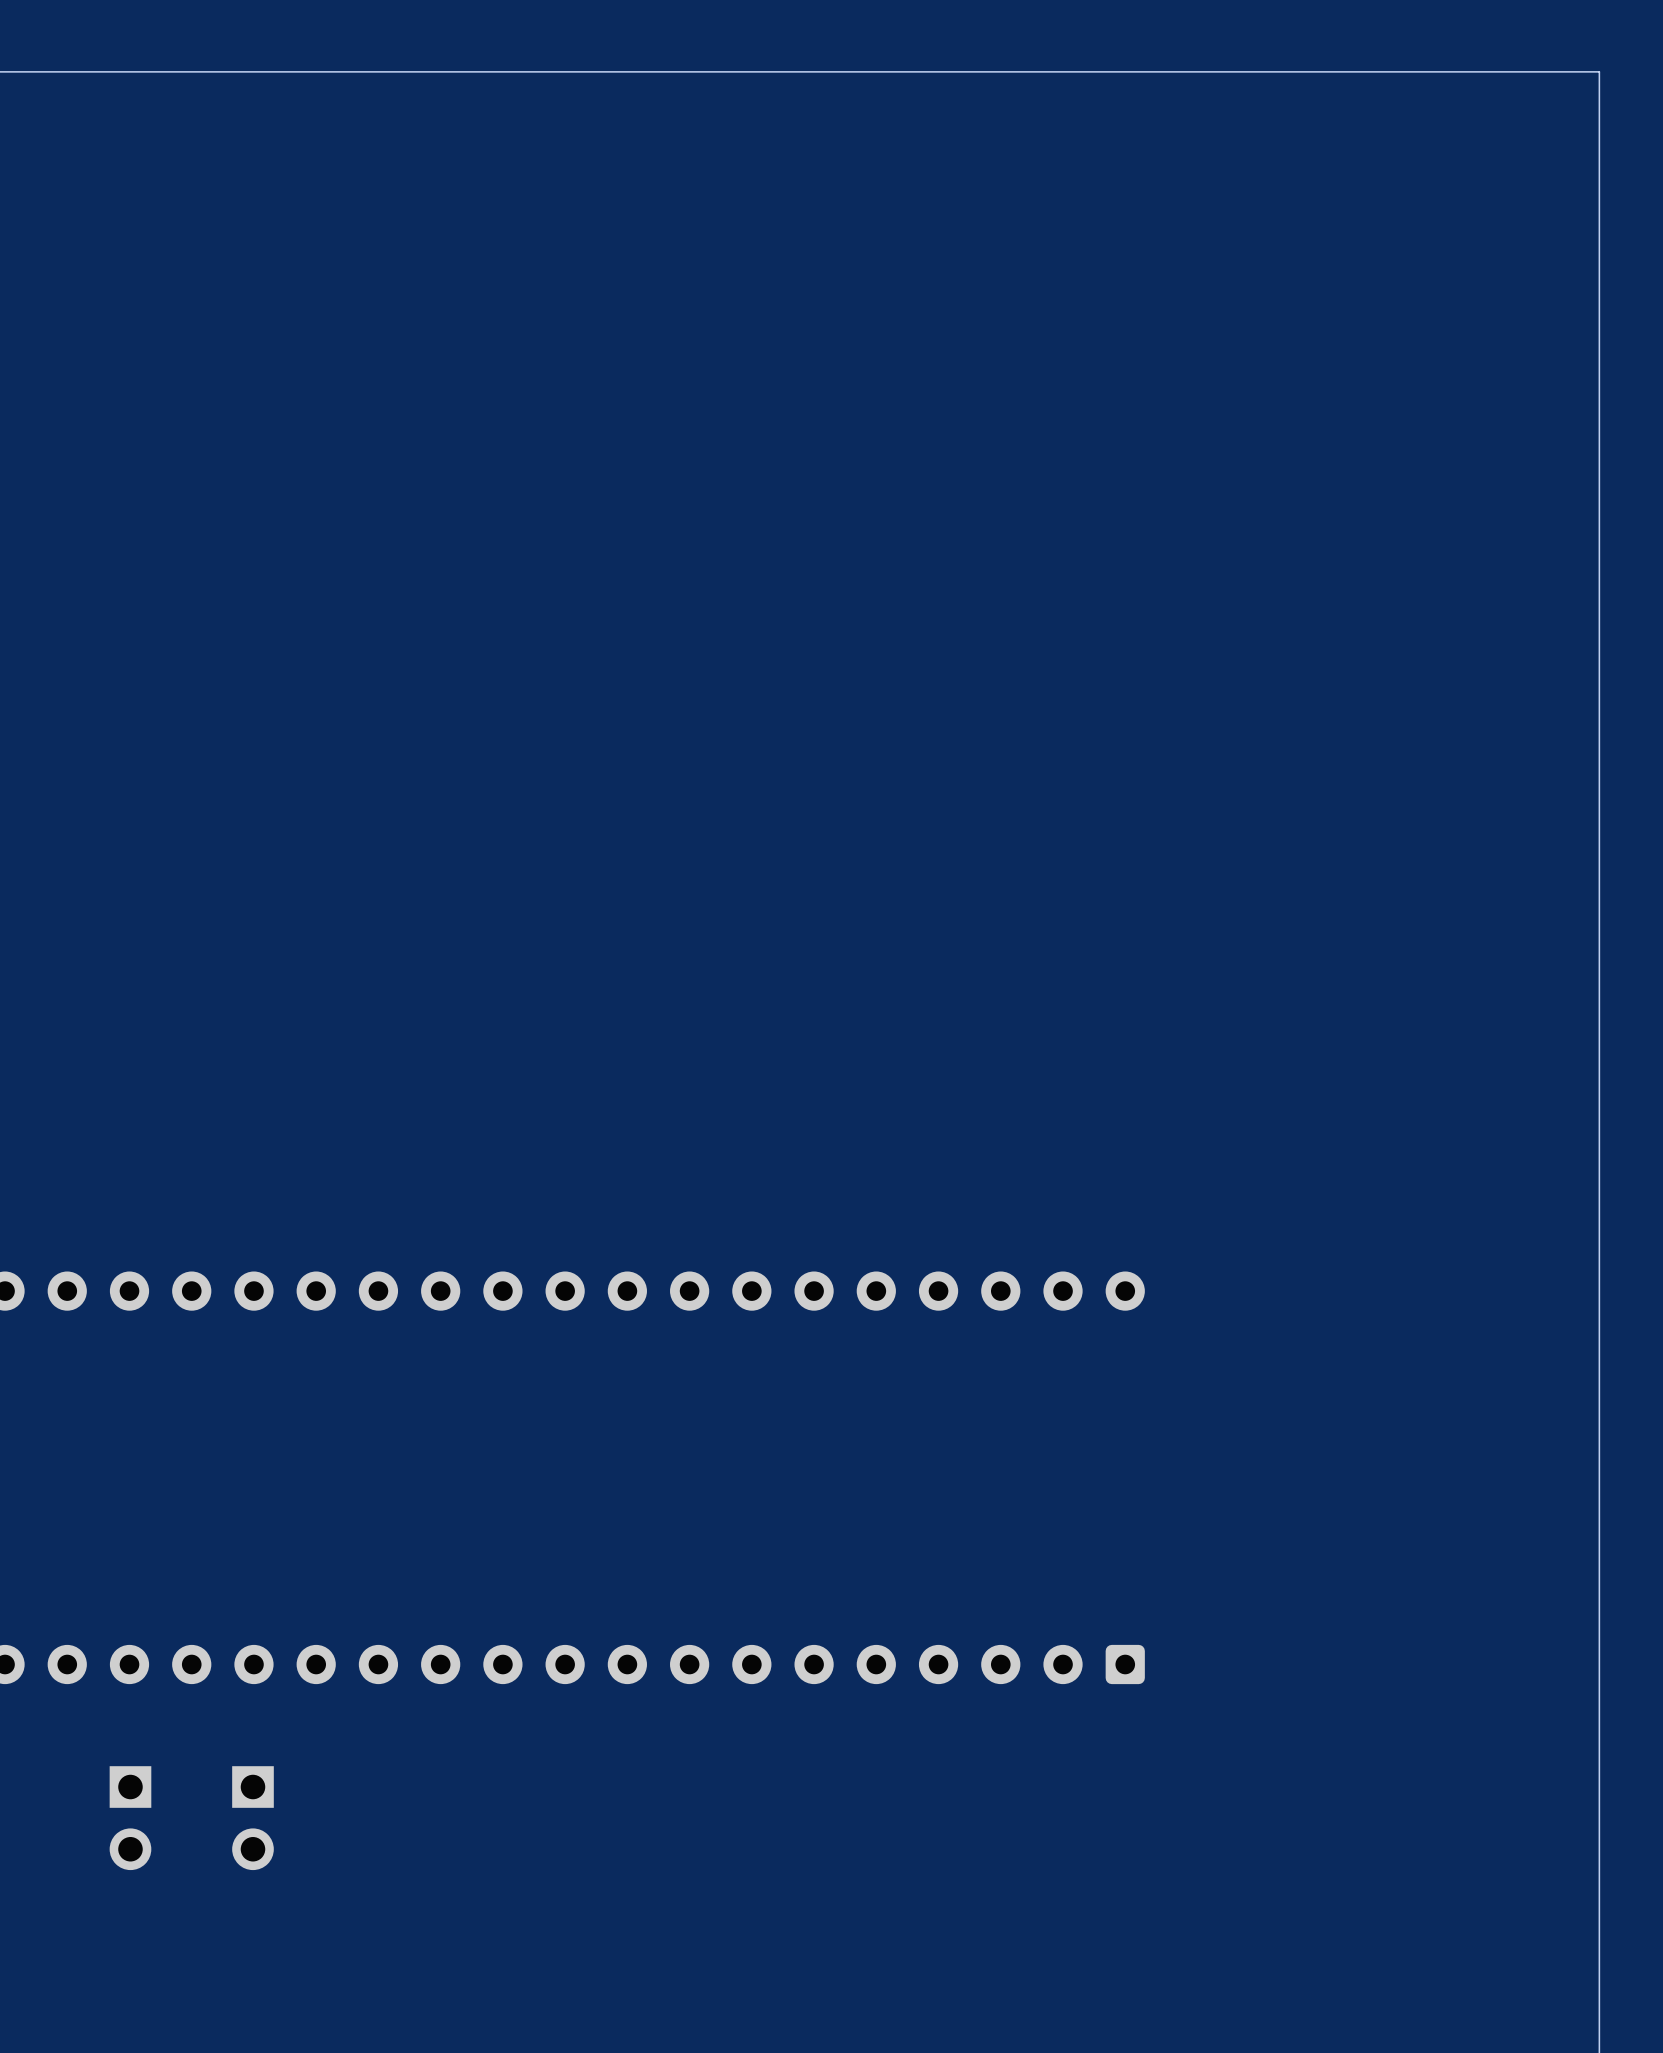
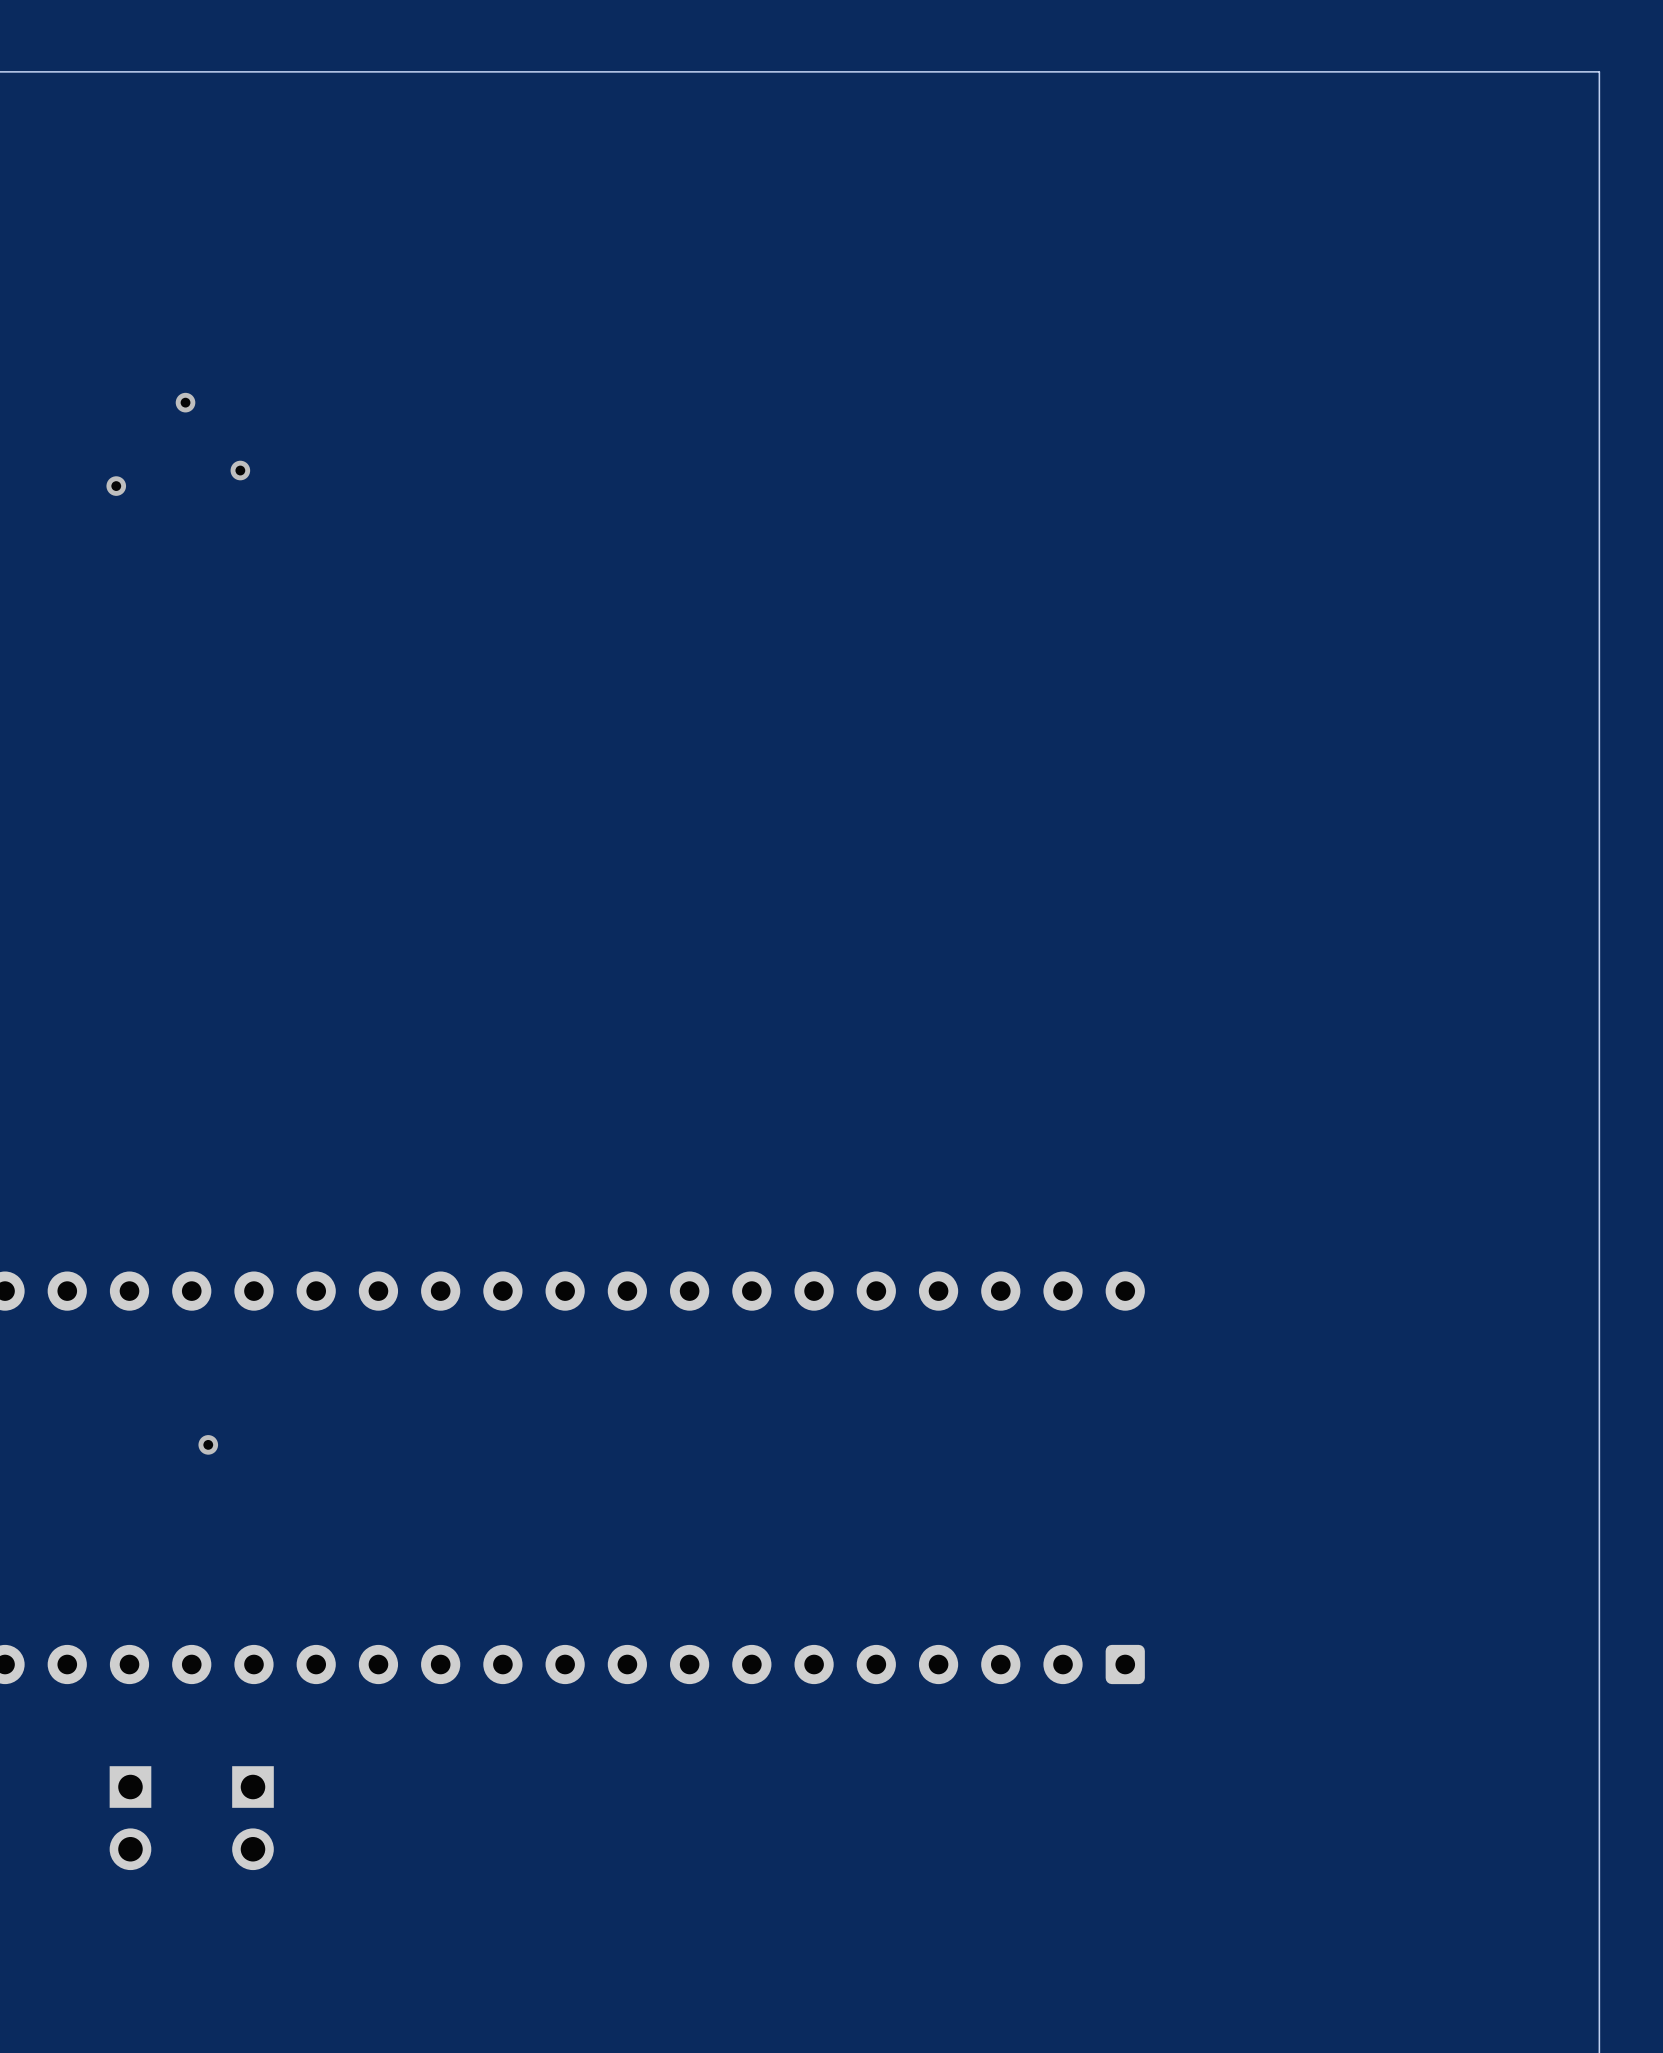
via: none -> (185, 402)
via: none -> (240, 470)
via: none -> (116, 486)
via: none -> (208, 1444)

